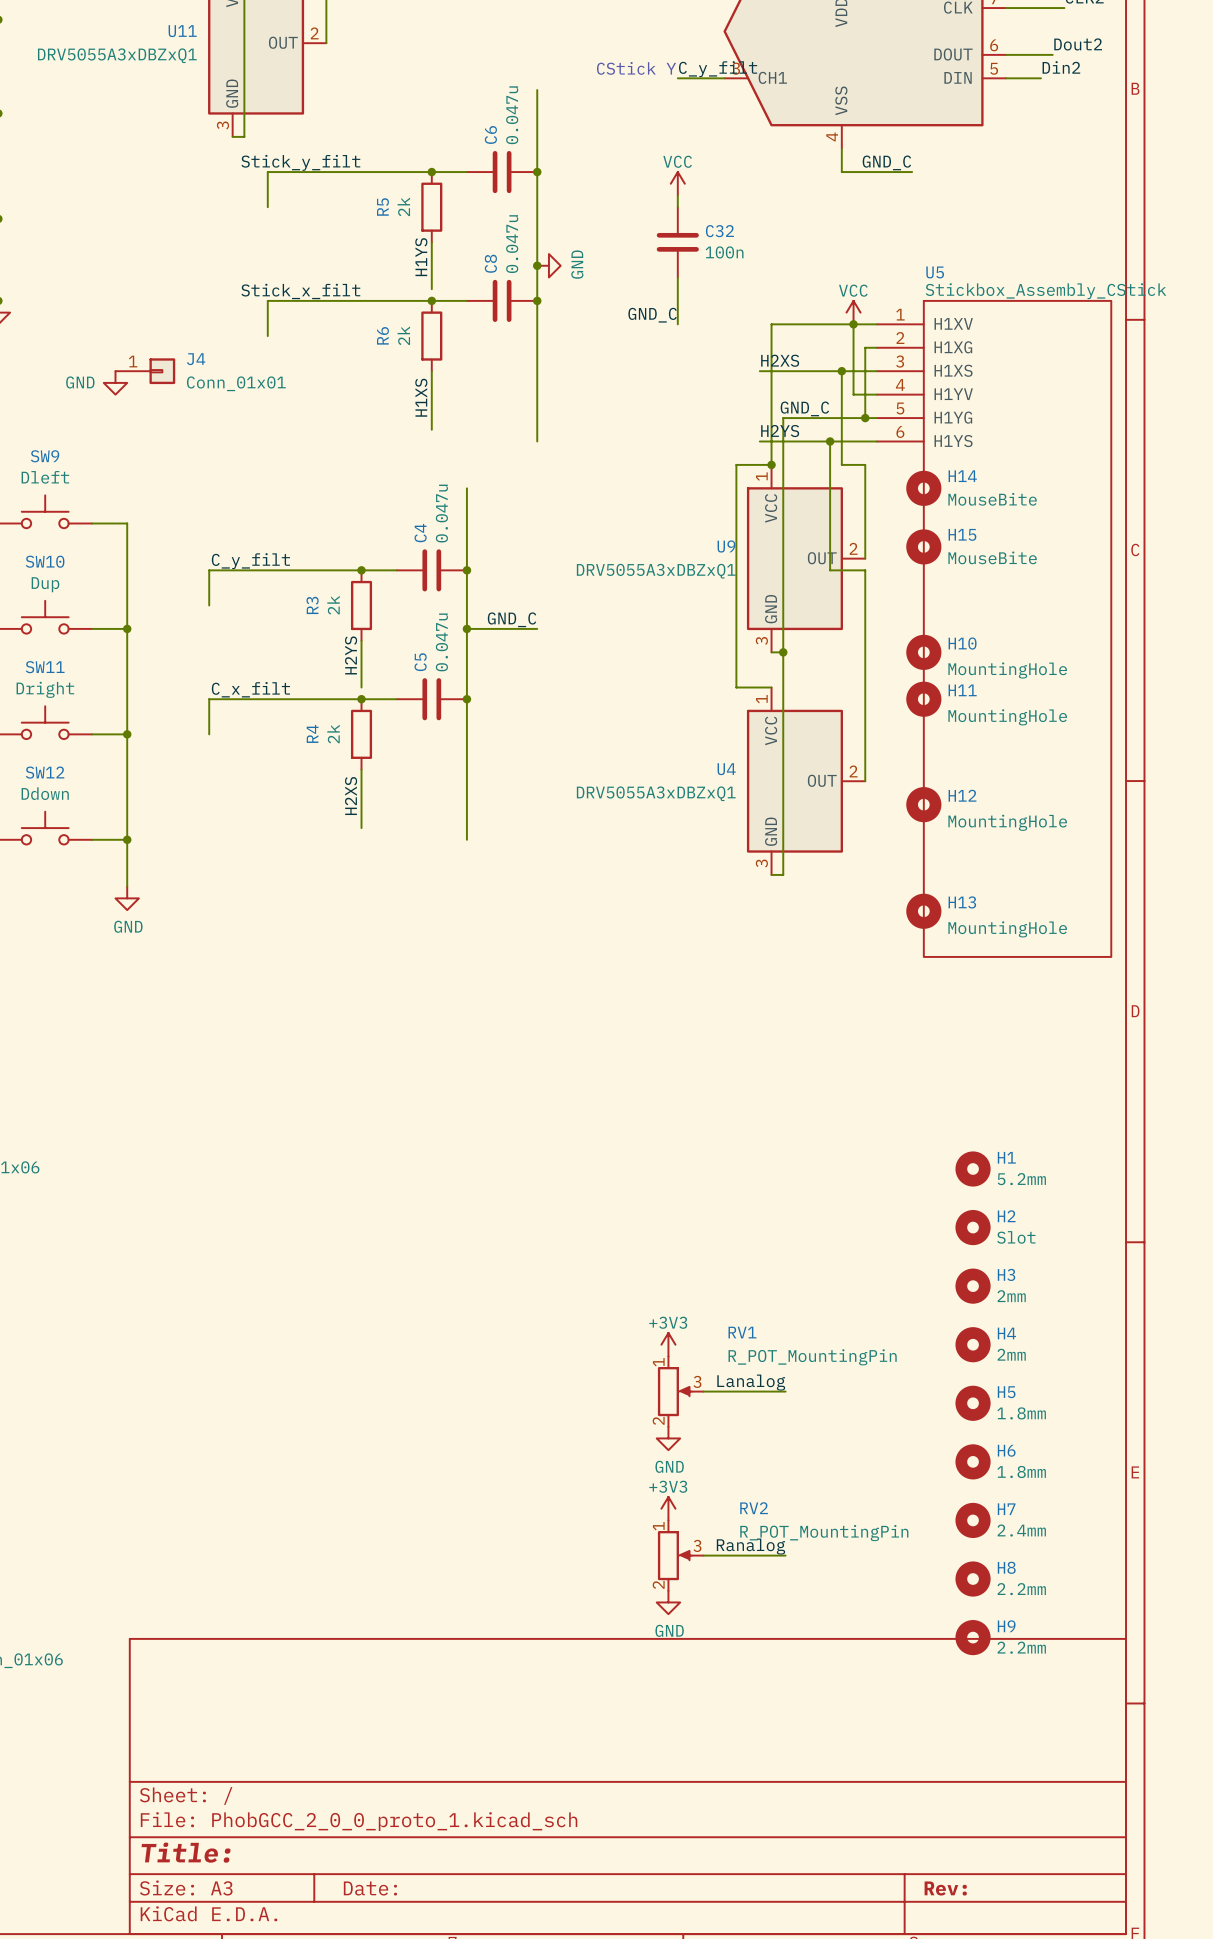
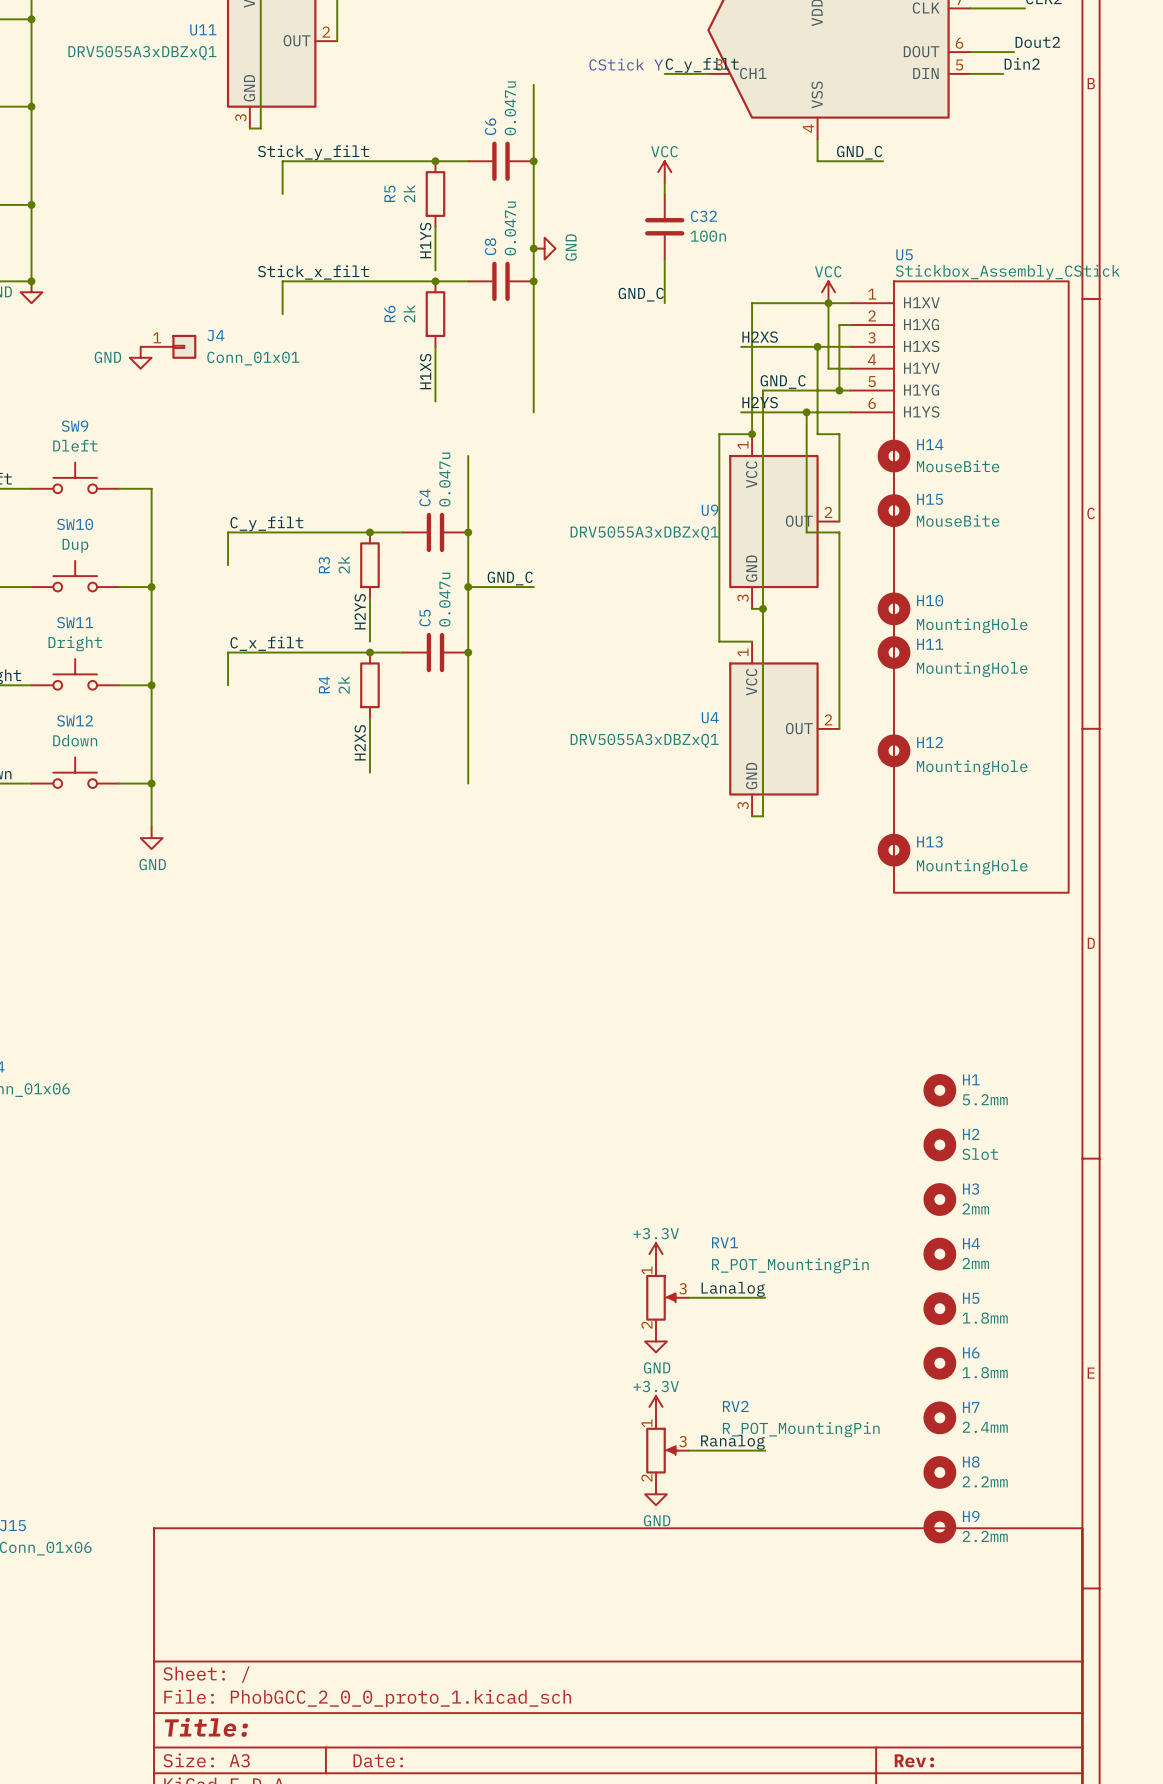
power symbol: +3V3 (668, 1344) -> +3.3V (656, 1254)
power symbol: +3V3 (668, 1508) -> +3.3V (656, 1406)

